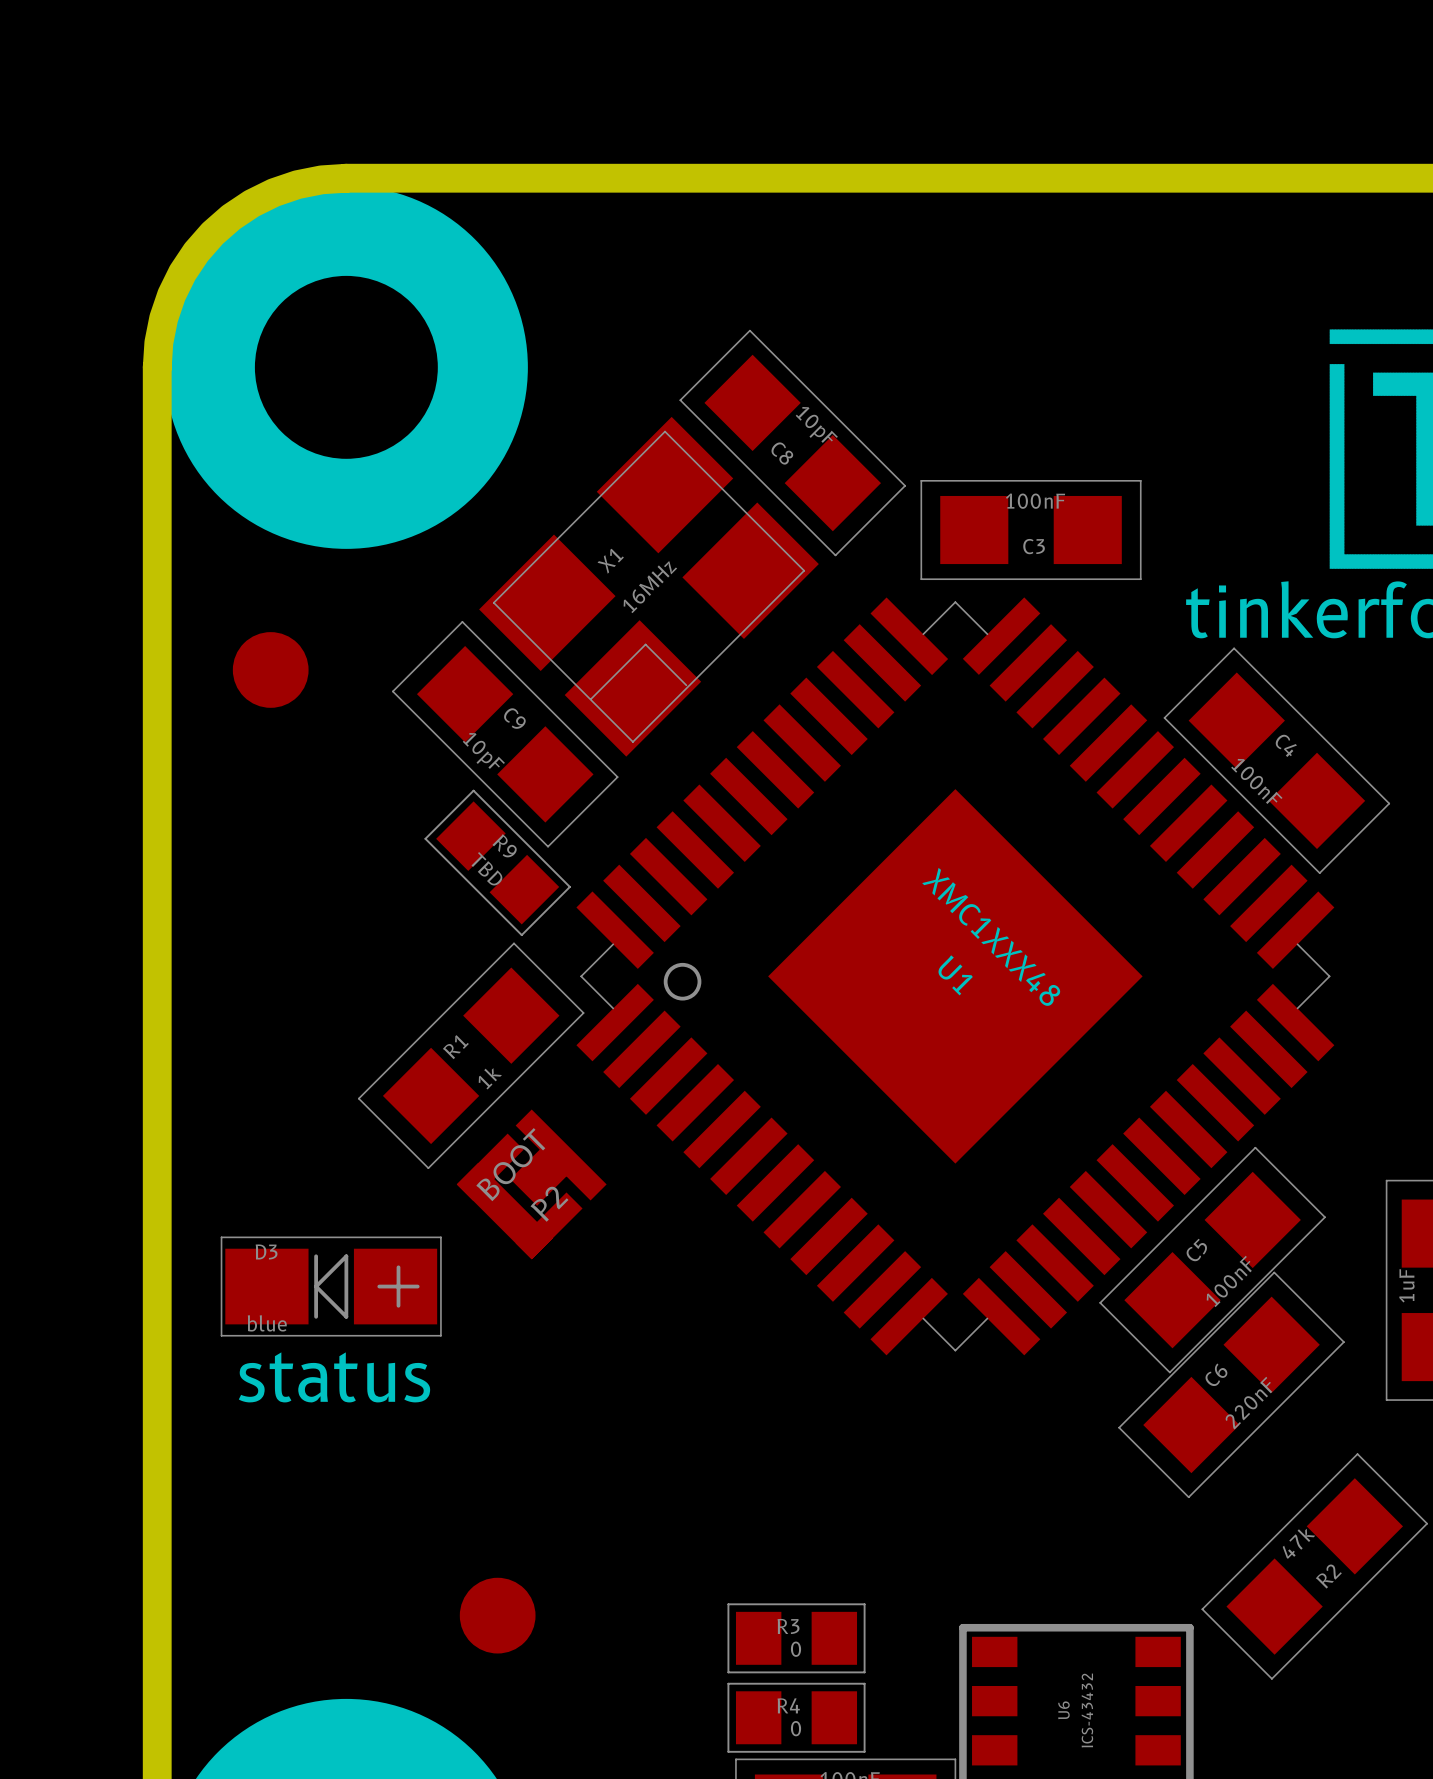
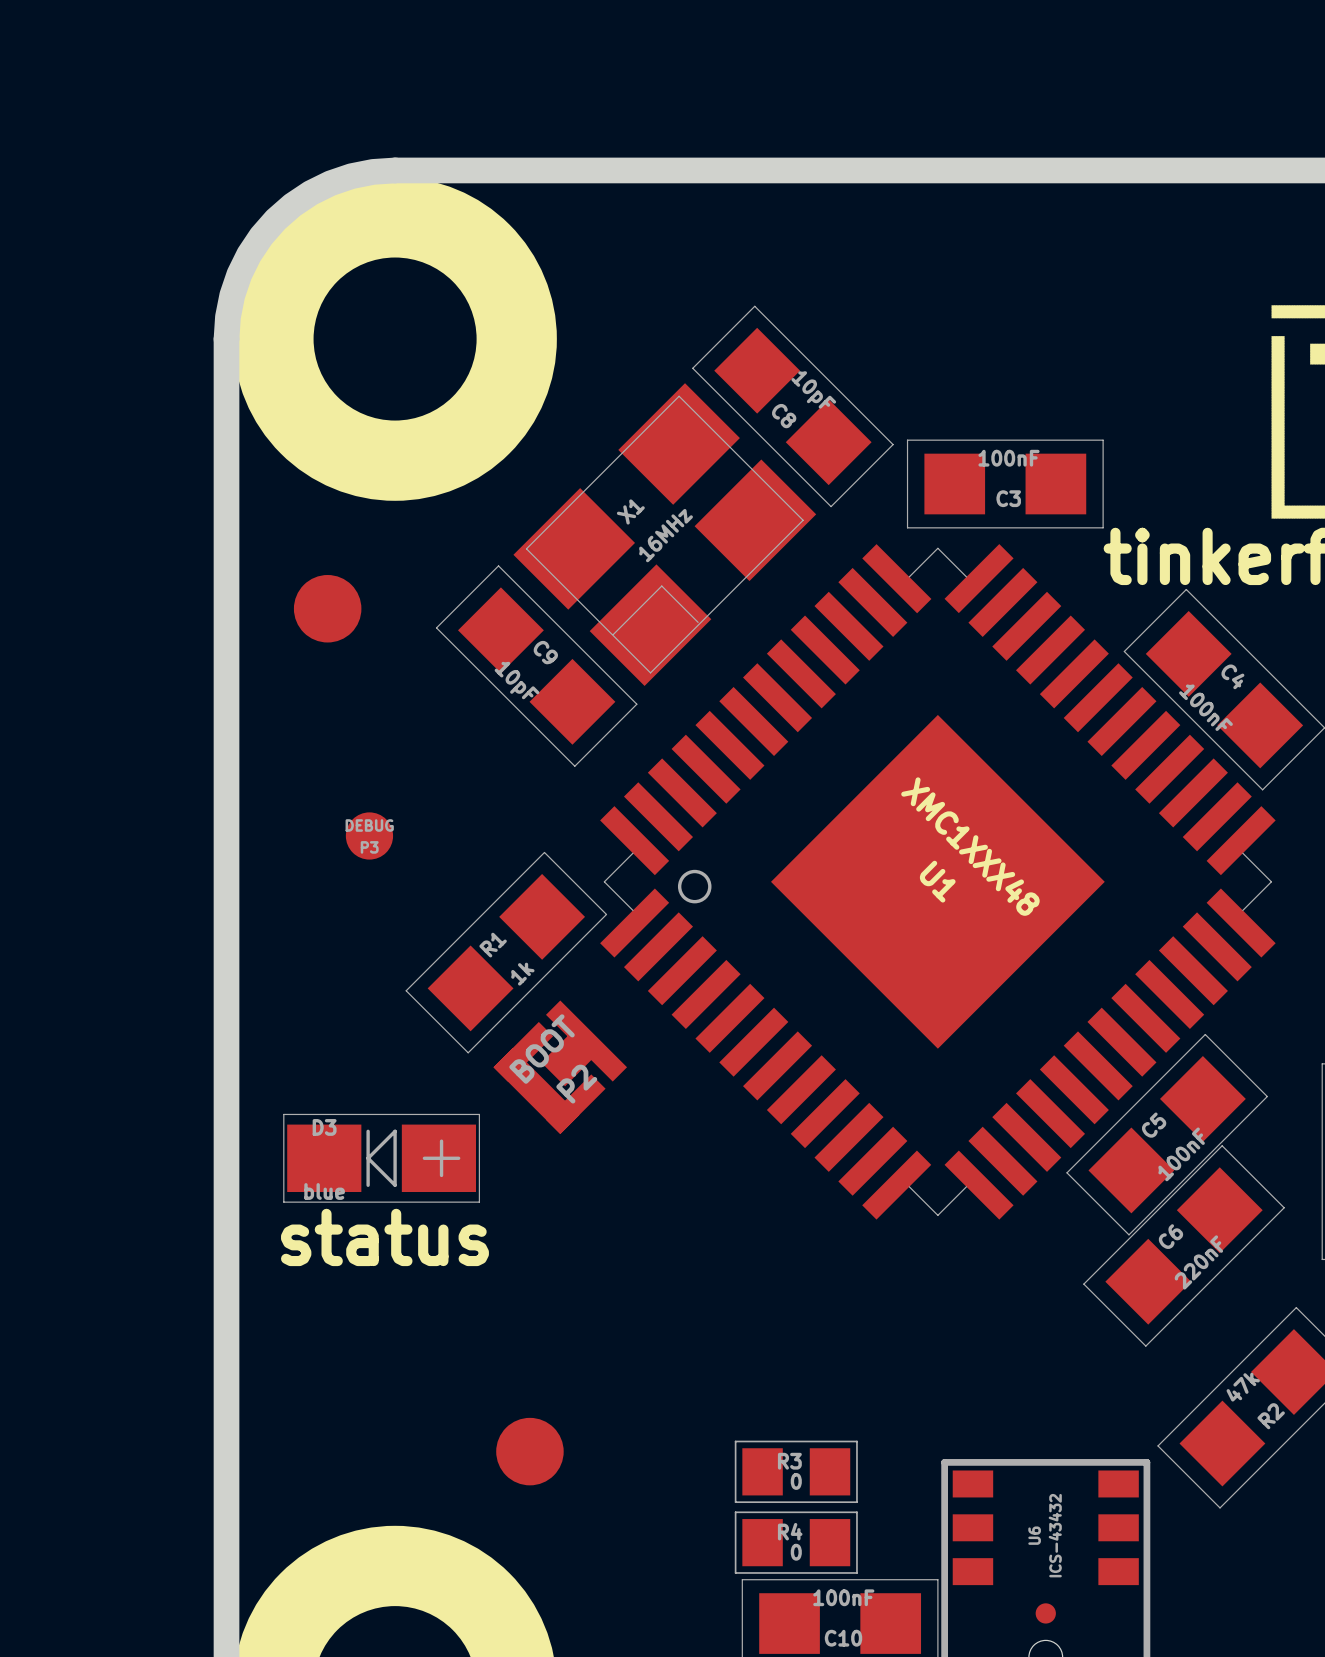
R9: TBD (497, 862) -> none
P3: none -> DEBUG (369, 835)

